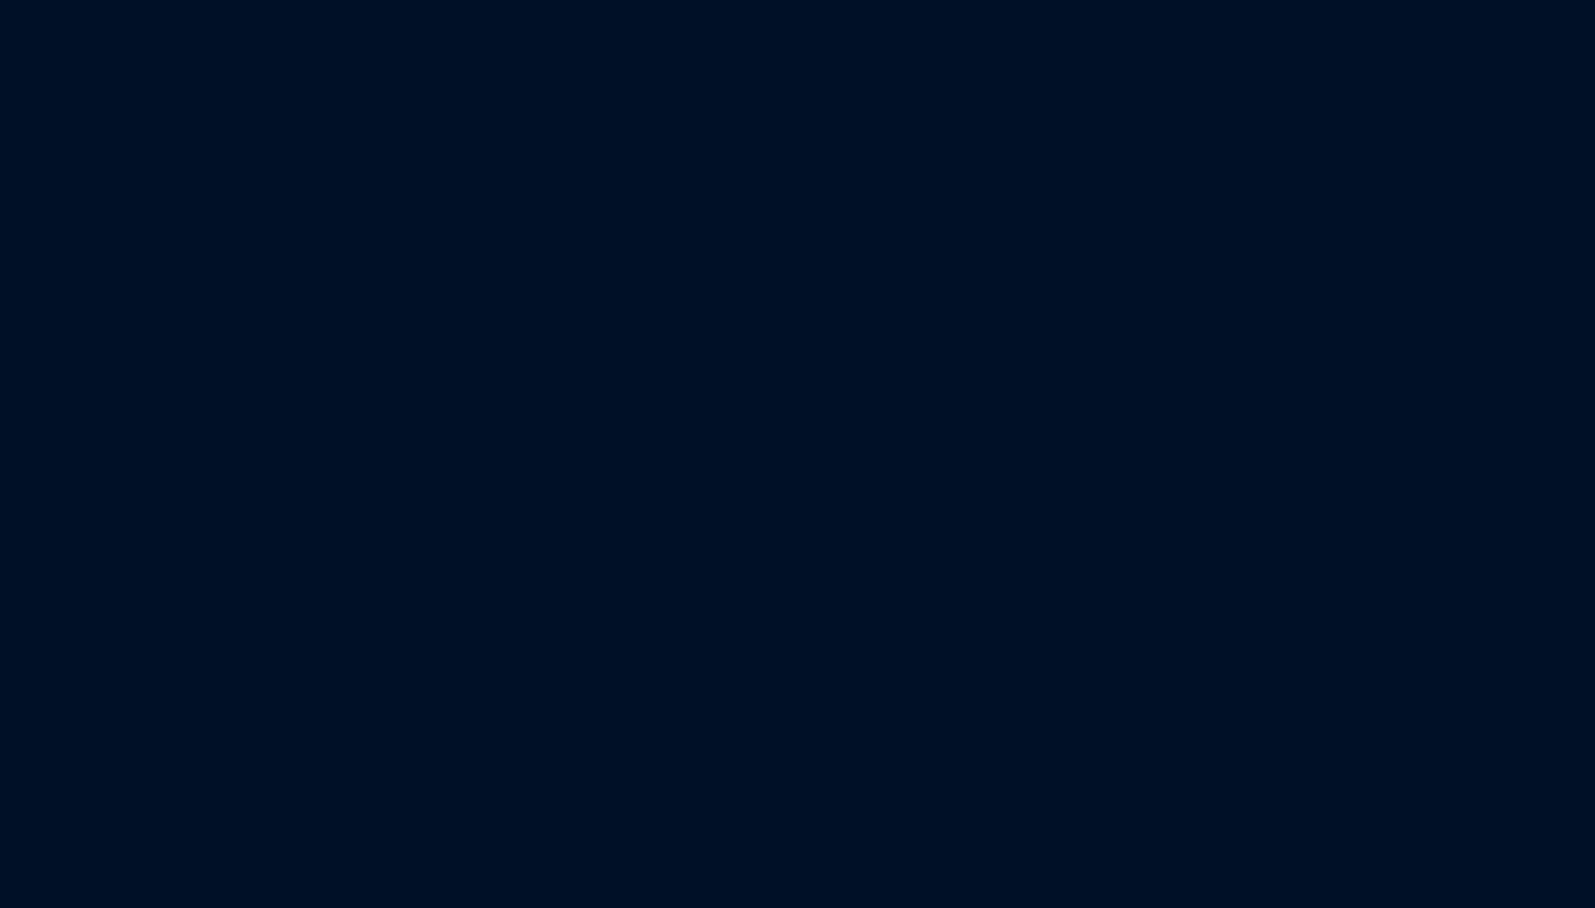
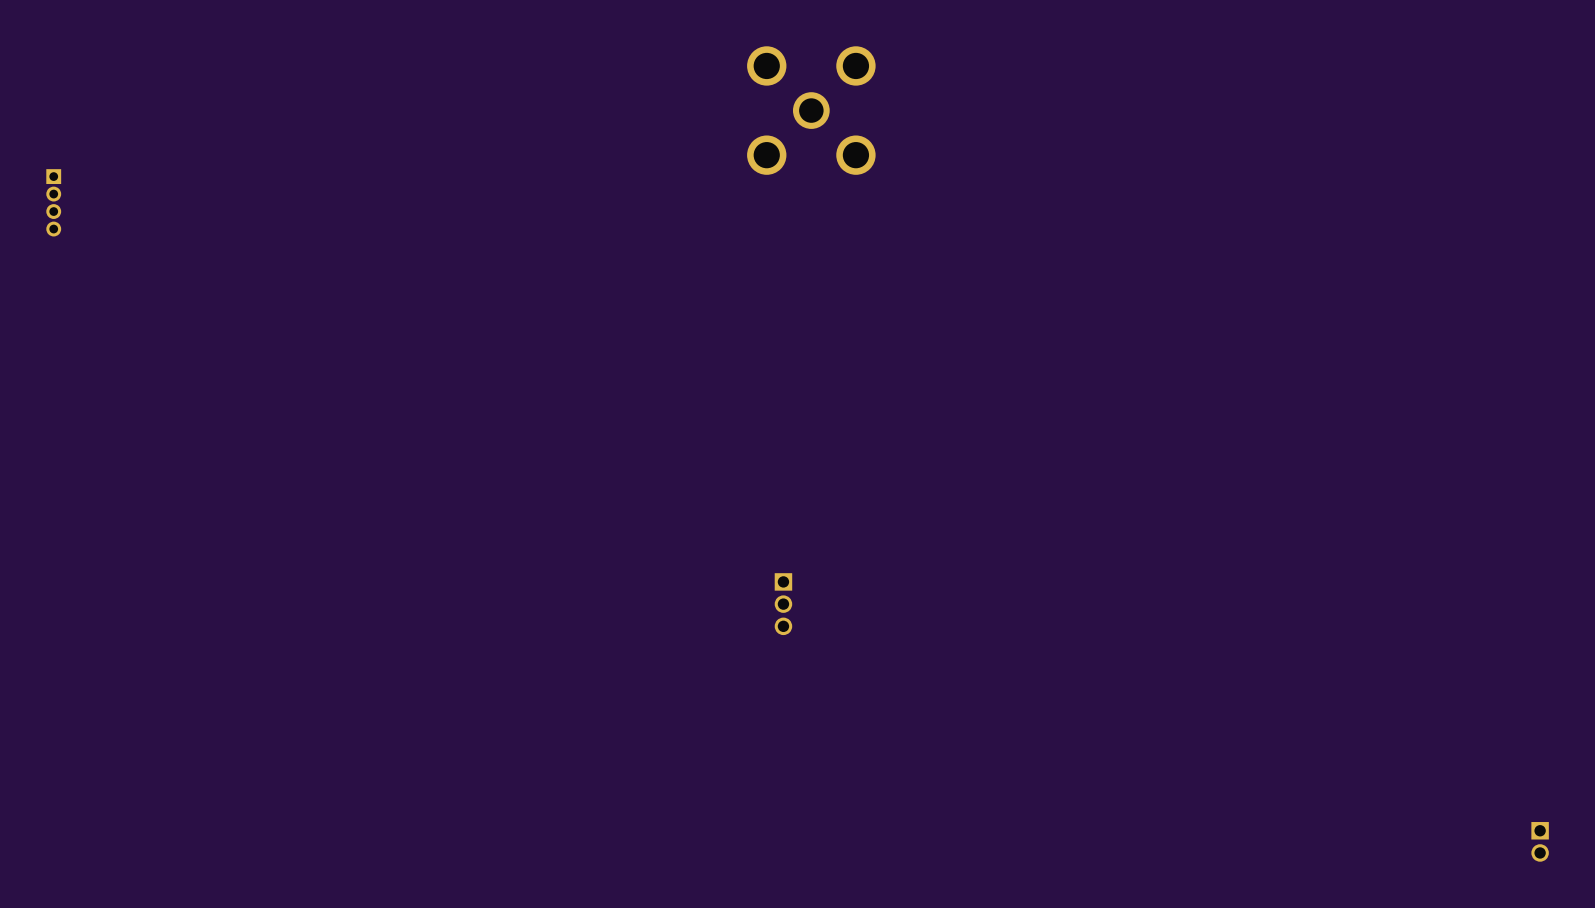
part: none -> (811, 110)
part: none -> (53, 202)
part: none -> (783, 604)
part: none -> (1540, 841)

